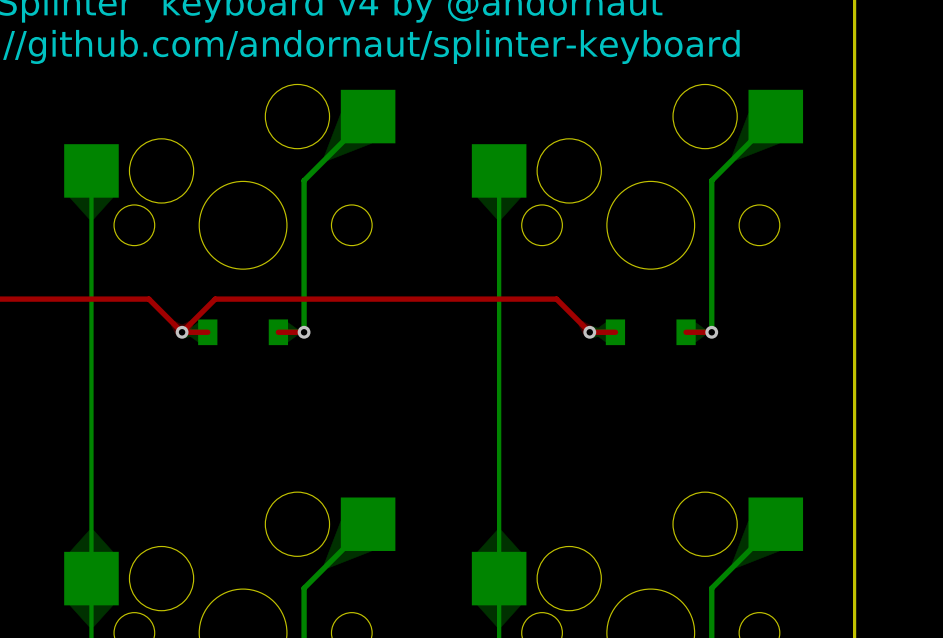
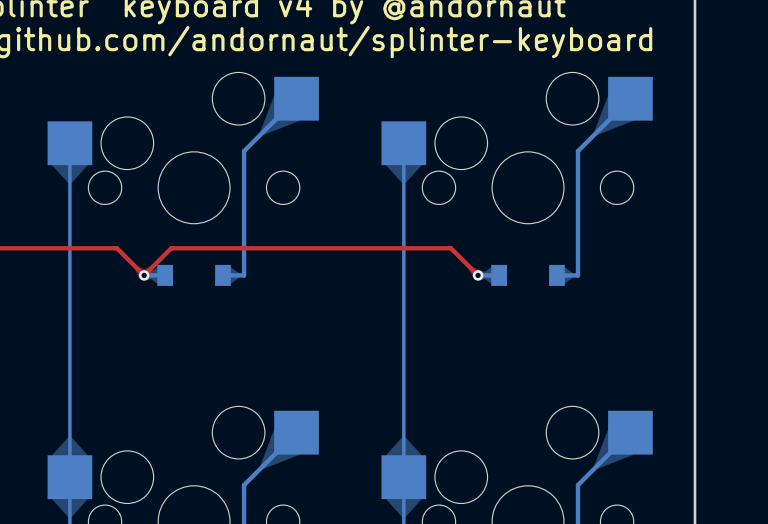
top track: (182, 332) (207, 332) -> none
top track: (278, 332) (304, 332) -> none
via: (304, 332) -> none
top track: (589, 332) (615, 332) -> none
top track: (686, 332) (711, 332) -> none
via: (711, 332) -> none

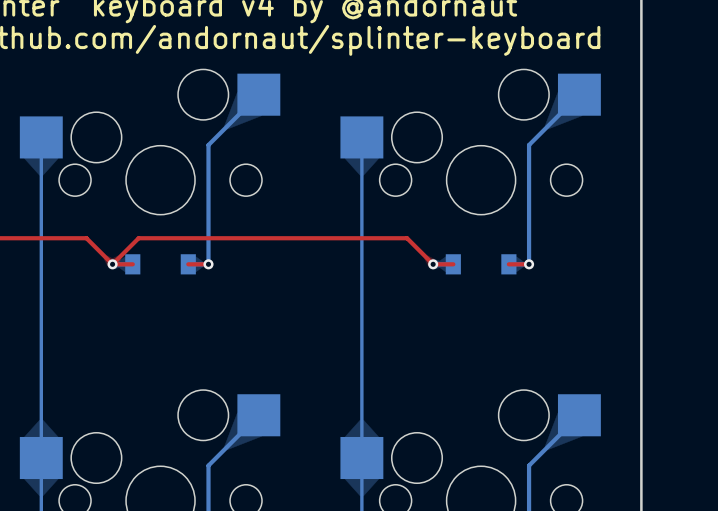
top track: none -> (112, 264) (132, 264)
top track: none -> (188, 264) (208, 264)
via: none -> (208, 264)
top track: none -> (433, 264) (453, 264)
top track: none -> (508, 264) (529, 264)
via: none -> (529, 264)

